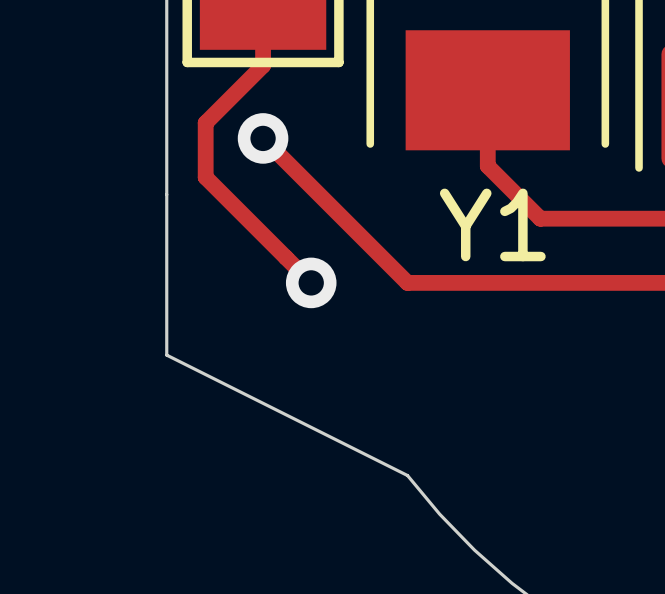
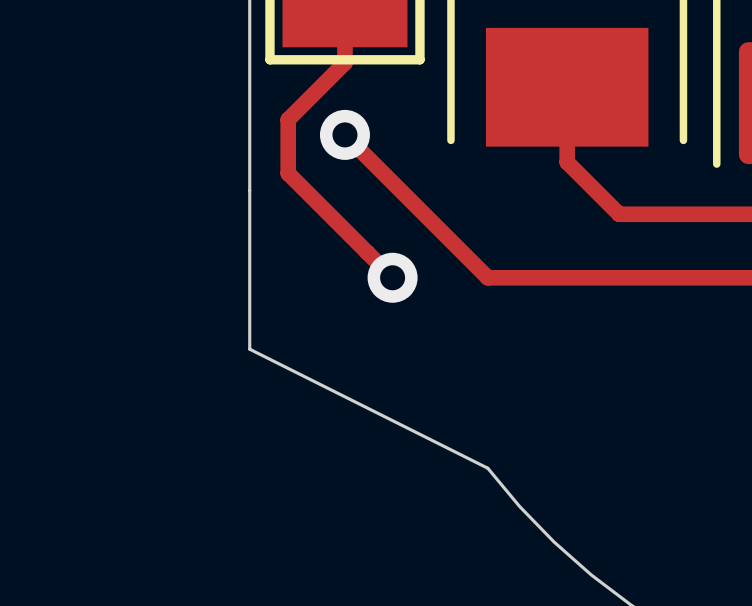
Y1 name: Y1 (492, 224) -> none

